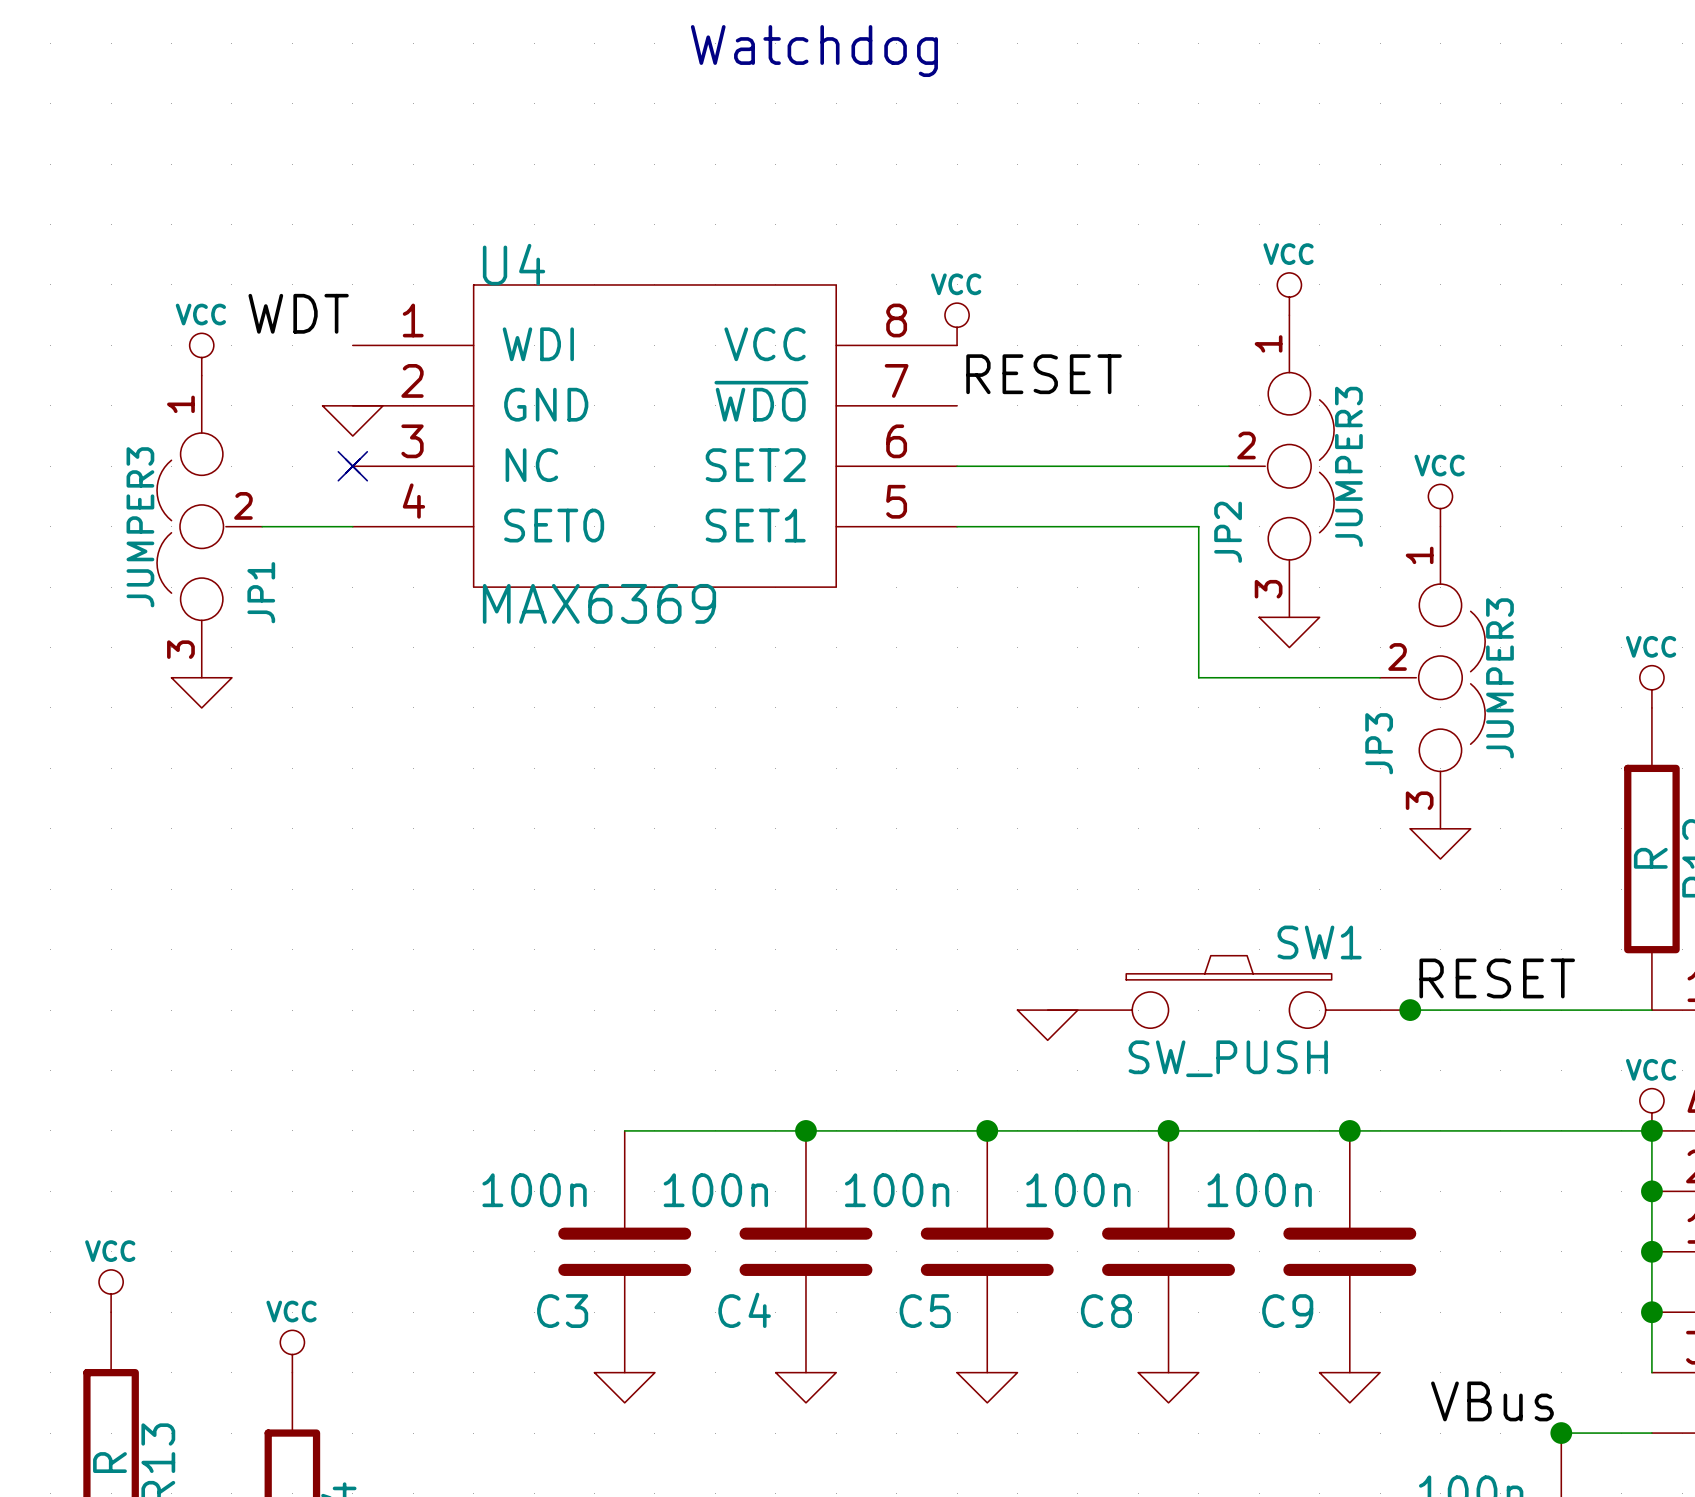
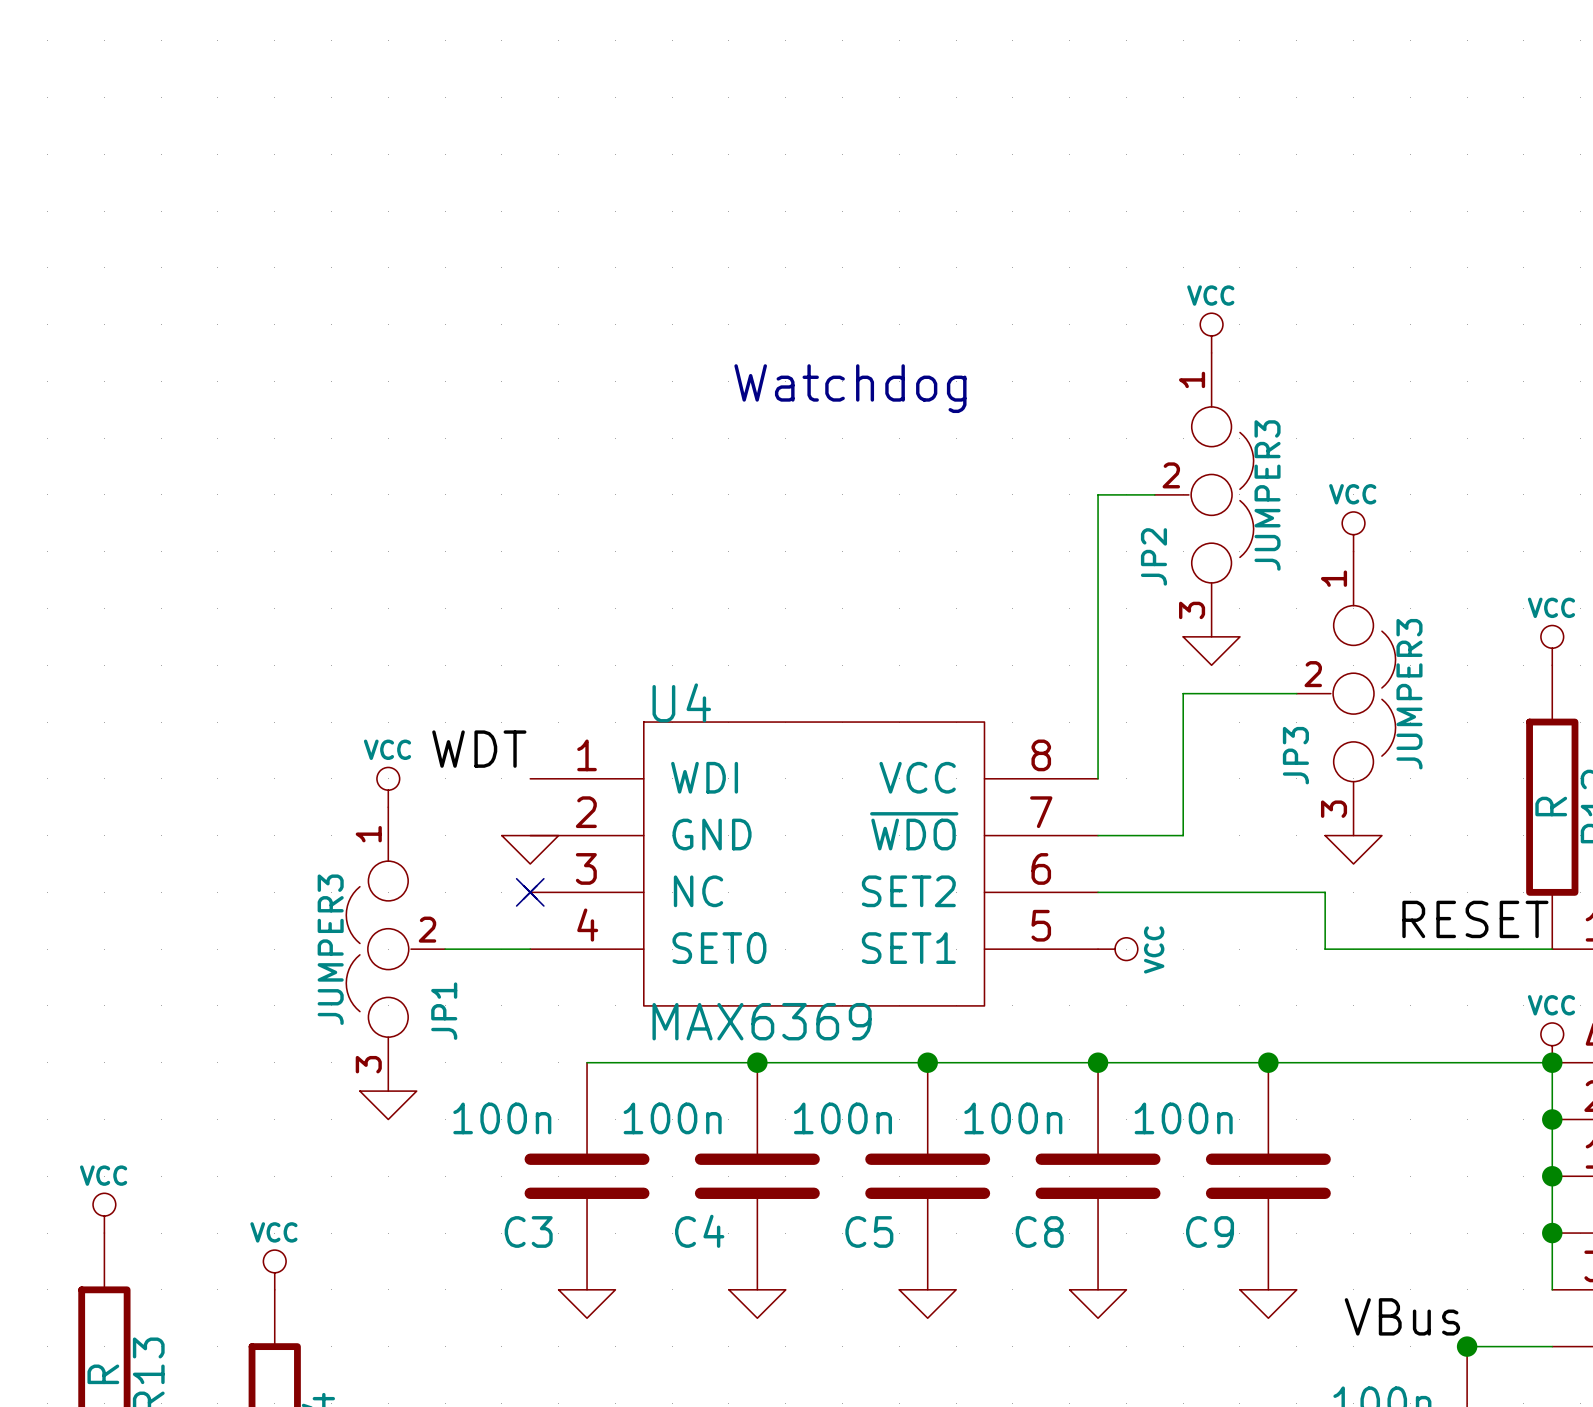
text position: Watchdog (814, 51) -> Watchdog (850, 388)
power symbol position: VCC (1289, 294) -> VCC (1211, 333)
label position: WDT (298, 313) -> WDT (479, 749)
power symbol: VCC (957, 324) -> none
power symbol: VCC (201, 354) -> none
label: RESET (1044, 374) -> none
power symbol: (352, 420) -> none
U4 position: (651, 436) -> (810, 863)
no-connect mark: (352, 466) -> none
wire: (957, 466) (1228, 466) -> none
JP2 position: (1281, 466) -> (1204, 494)
power symbol position: VCC (1440, 505) -> VCC (1353, 531)
JP1 position: (209, 526) -> (395, 949)
wire: (262, 526) (352, 526) -> (445, 949) (530, 949)
wire: (957, 526) (1168, 526) -> (1098, 778) (1098, 494)
wire: (1198, 526) (1198, 677) (1380, 677) -> (1126, 494) (1154, 494)
power symbol position: (1289, 632) -> (1211, 651)
JP3 position: (1432, 677) -> (1346, 693)
power symbol: (201, 692) -> none
wire: none -> (1296, 693) (1183, 693) (1183, 835) (1098, 835)
power symbol: none -> VCC (388, 787)
power symbol position: (1440, 843) -> (1353, 849)
power symbol: none -> (530, 849)
no-connect mark: none -> (530, 892)
wire: none -> (1098, 892) (1325, 892) (1325, 949)
label position: RESET (1497, 978) -> RESET (1475, 919)
SW1: SW_PUSH (1228, 991) -> none
power symbol: none -> VCC (1117, 949)
junction: (1410, 1010) -> none
power symbol: (1047, 1025) -> none
power symbol: none -> (388, 1105)

